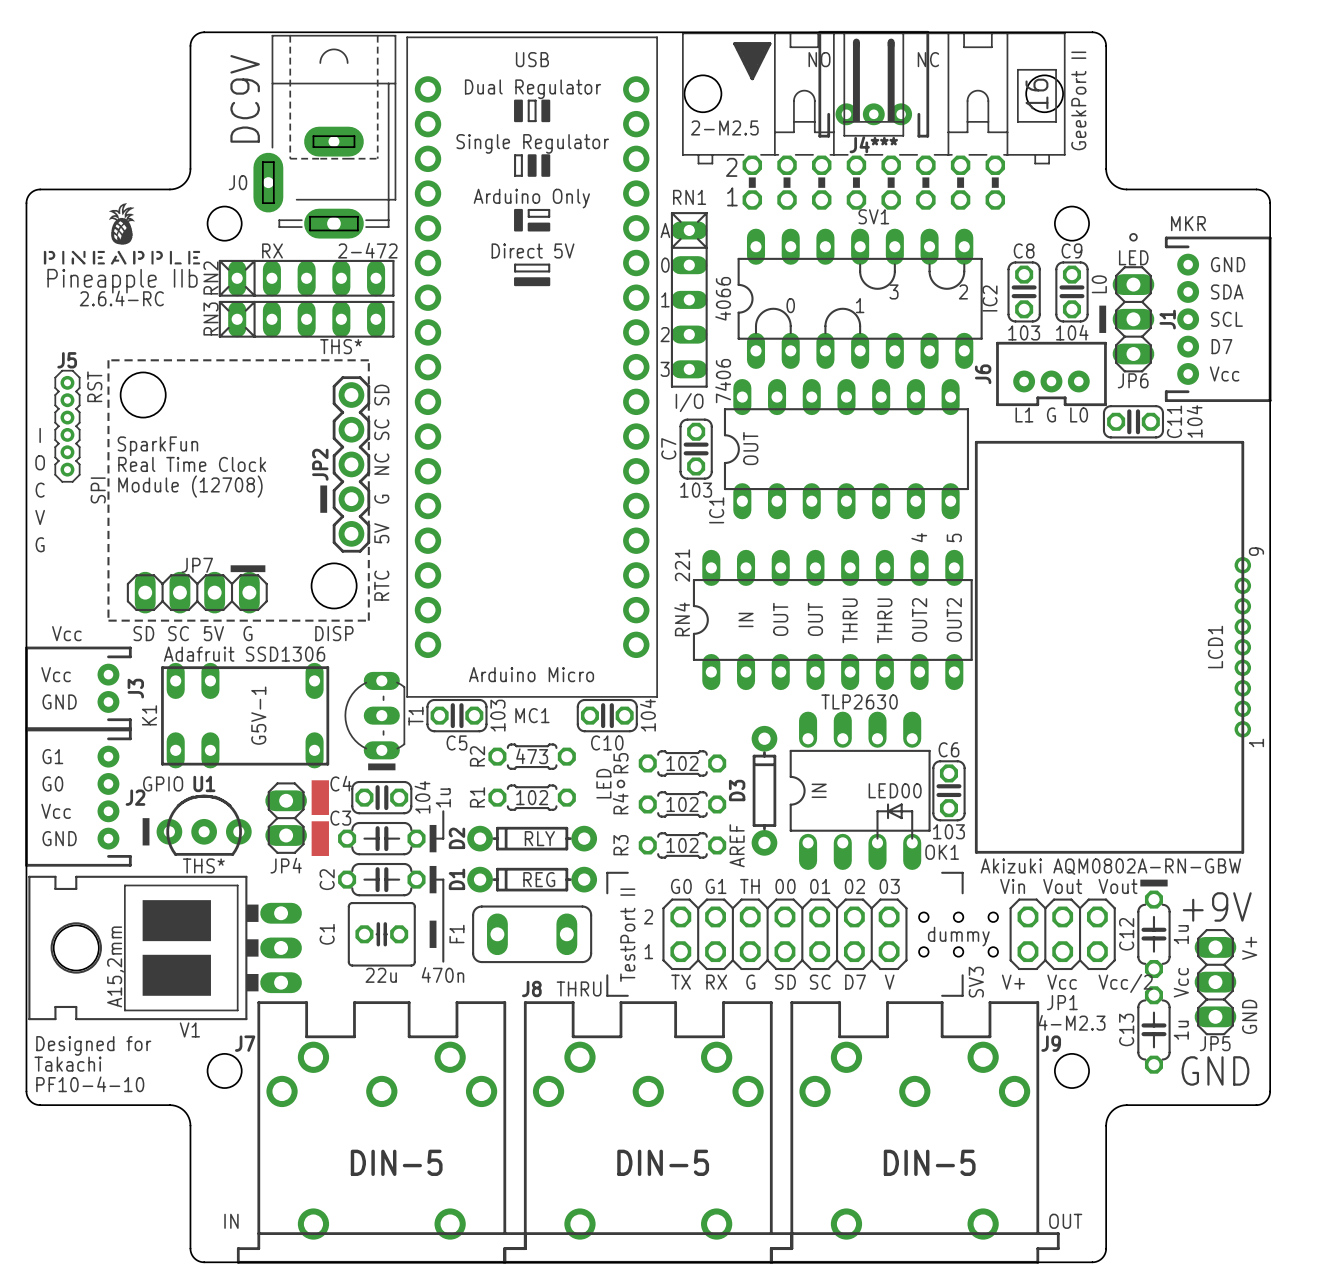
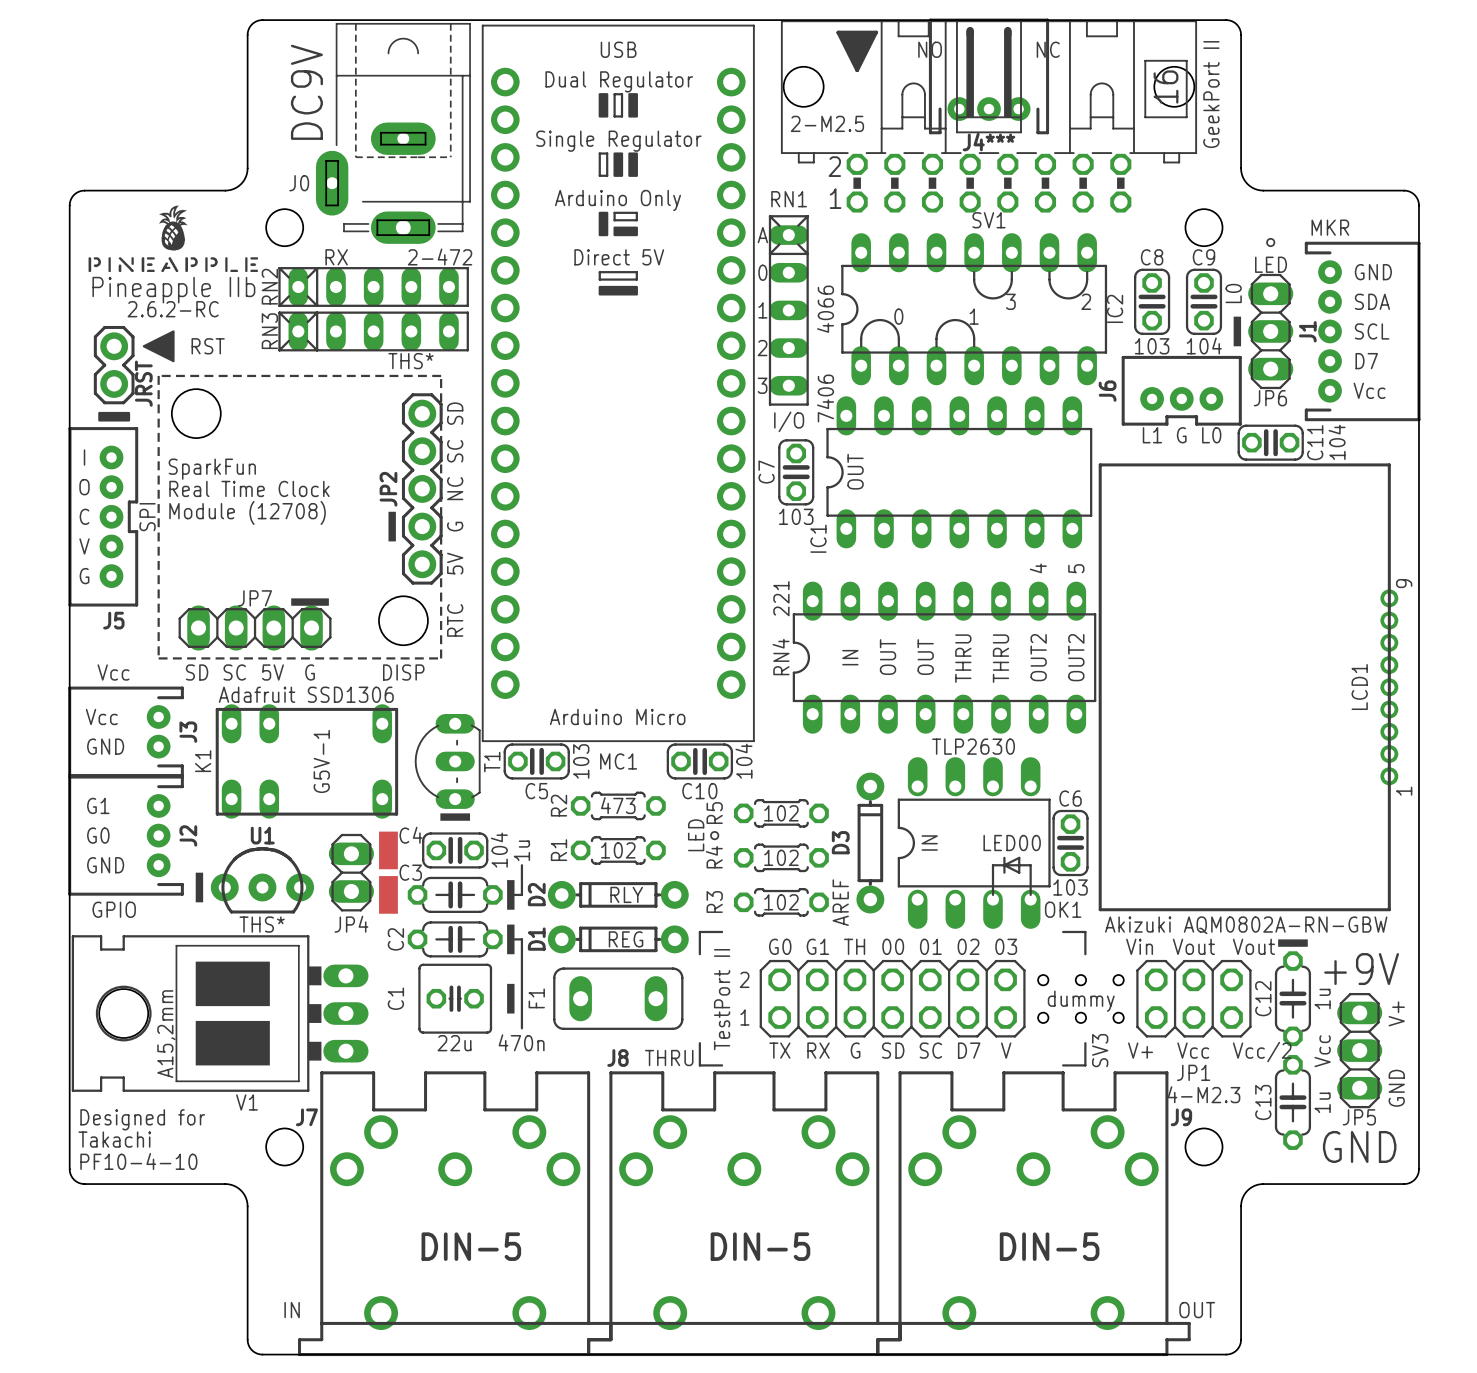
text: 2.6.4-RC (121, 298) -> 2.6.2-RC (173, 309)
drawing: none -> [142, 330, 175, 363]
JRST: none -> (114, 365)
J5 name position: J5 (67, 360) -> J5 (113, 620)
J5 footprint: [54, 369, 81, 483] -> [68, 427, 139, 607]
text rotation: 0° (94, 386) -> 90° clockwise (208, 346)
text position: RST (94, 386) -> RST (208, 346)
drawing: none -> [98, 411, 131, 422]
J2 footprint: [25, 728, 132, 867] -> [68, 775, 184, 896]
text position: GPIO (163, 783) -> GPIO (114, 909)
text: Vcc (56, 811) -> GND (105, 865)
text: GND (59, 838) -> none

